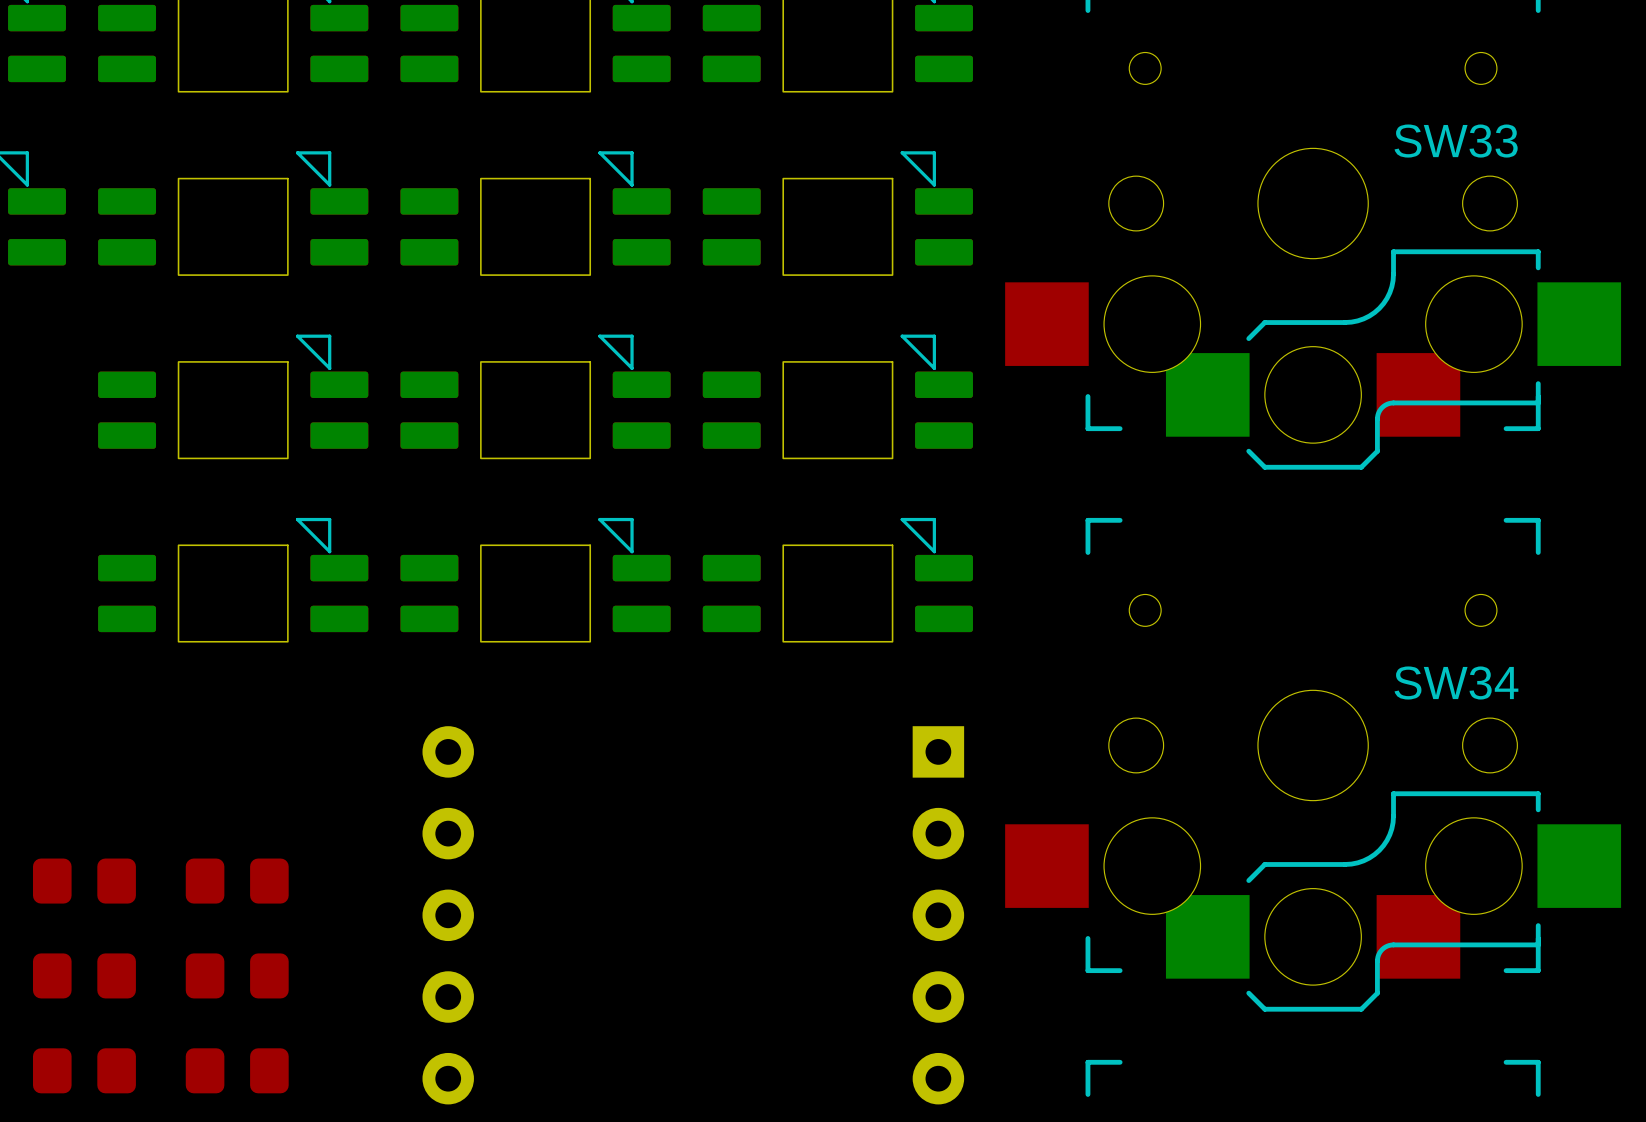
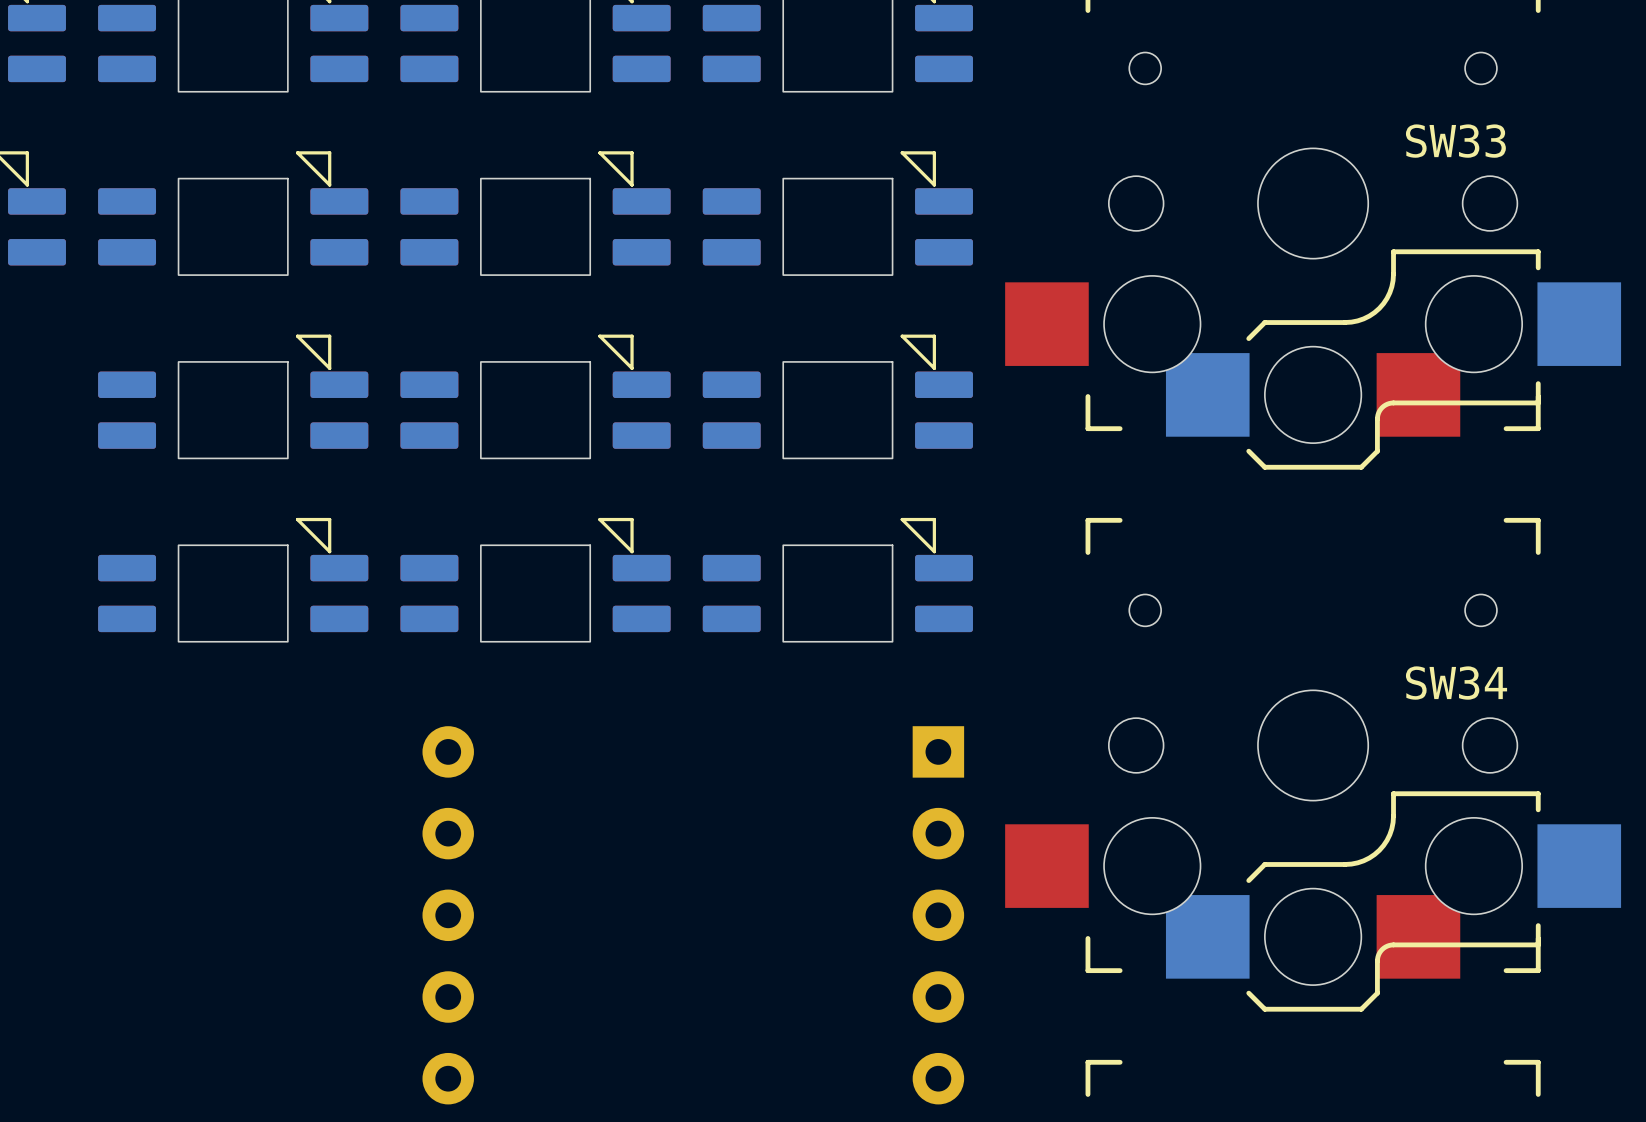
part: (84, 881) -> none
part: (237, 881) -> none
part: (84, 975) -> none
part: (237, 975) -> none
part: (84, 1070) -> none
part: (237, 1070) -> none

